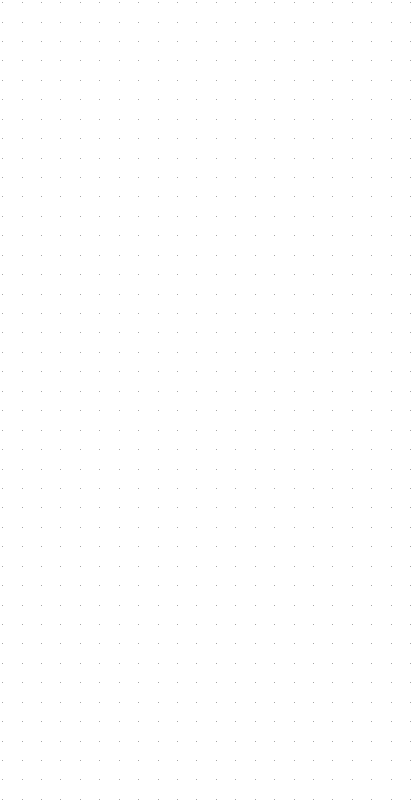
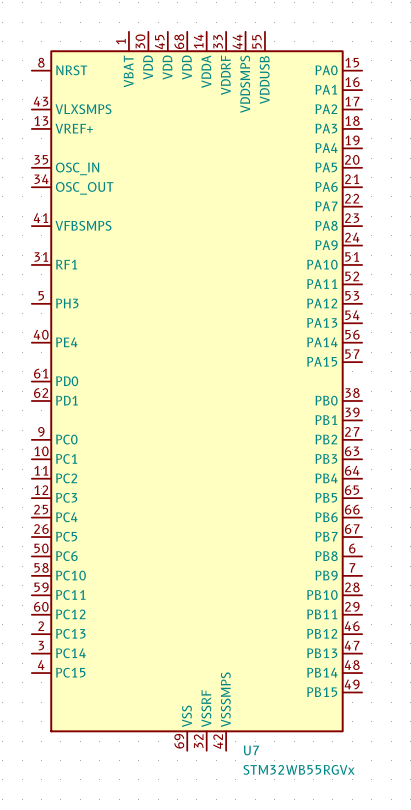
U7: none -> STM32WB55RGVx (196, 391)

